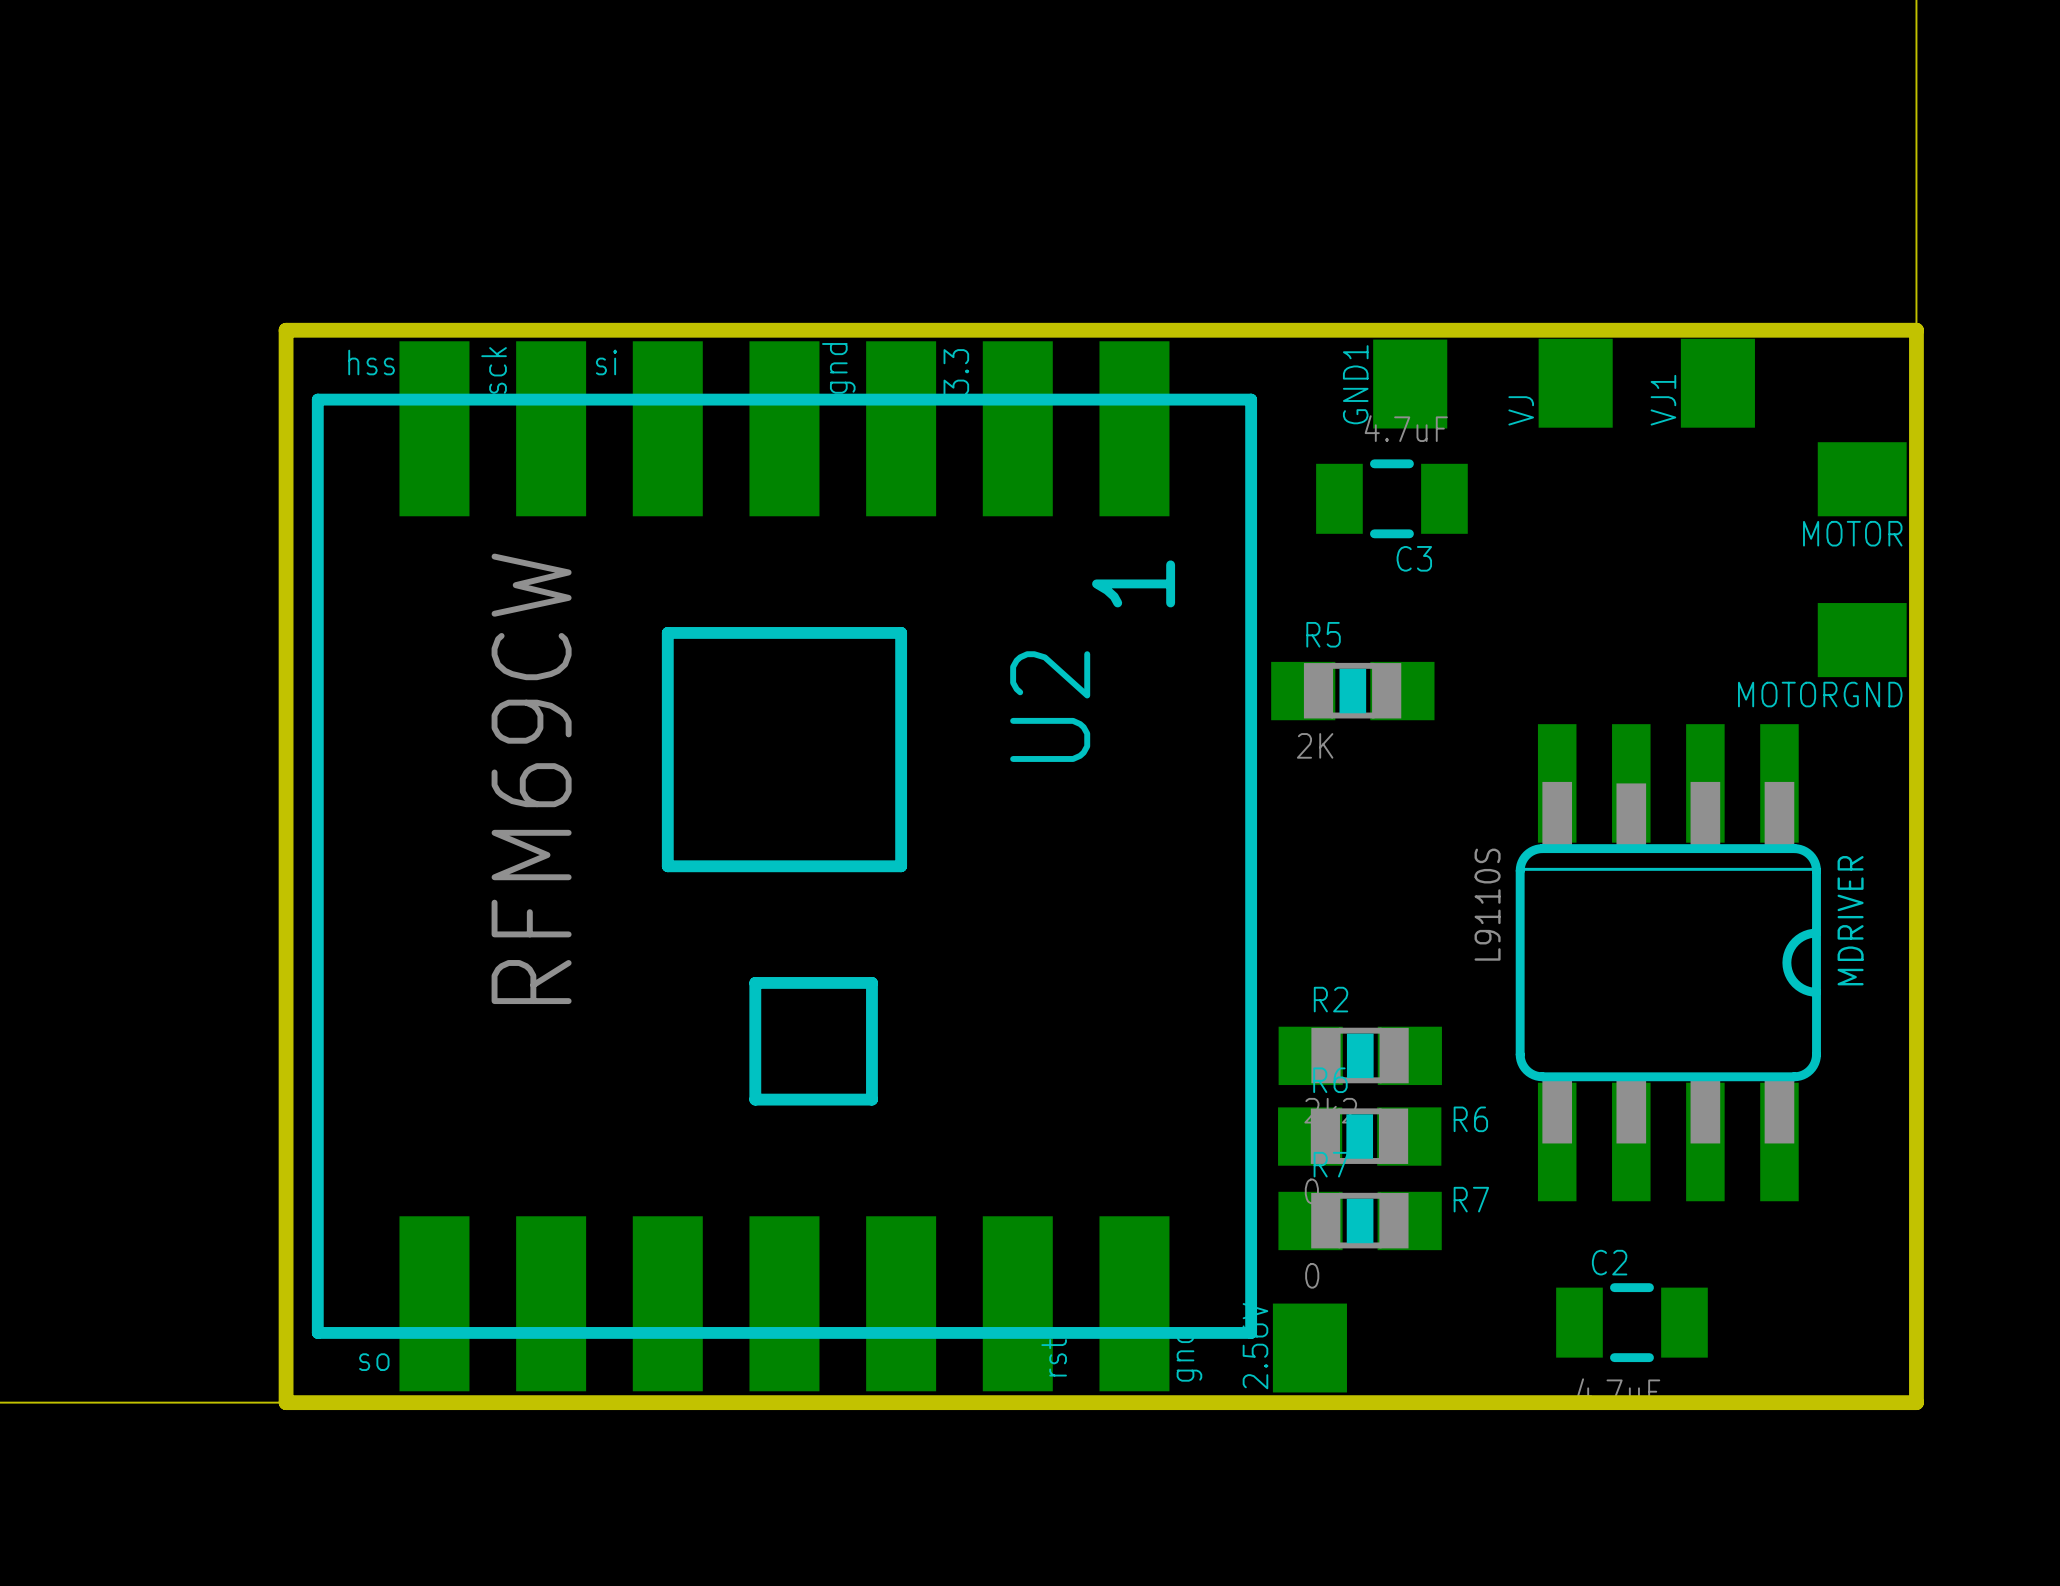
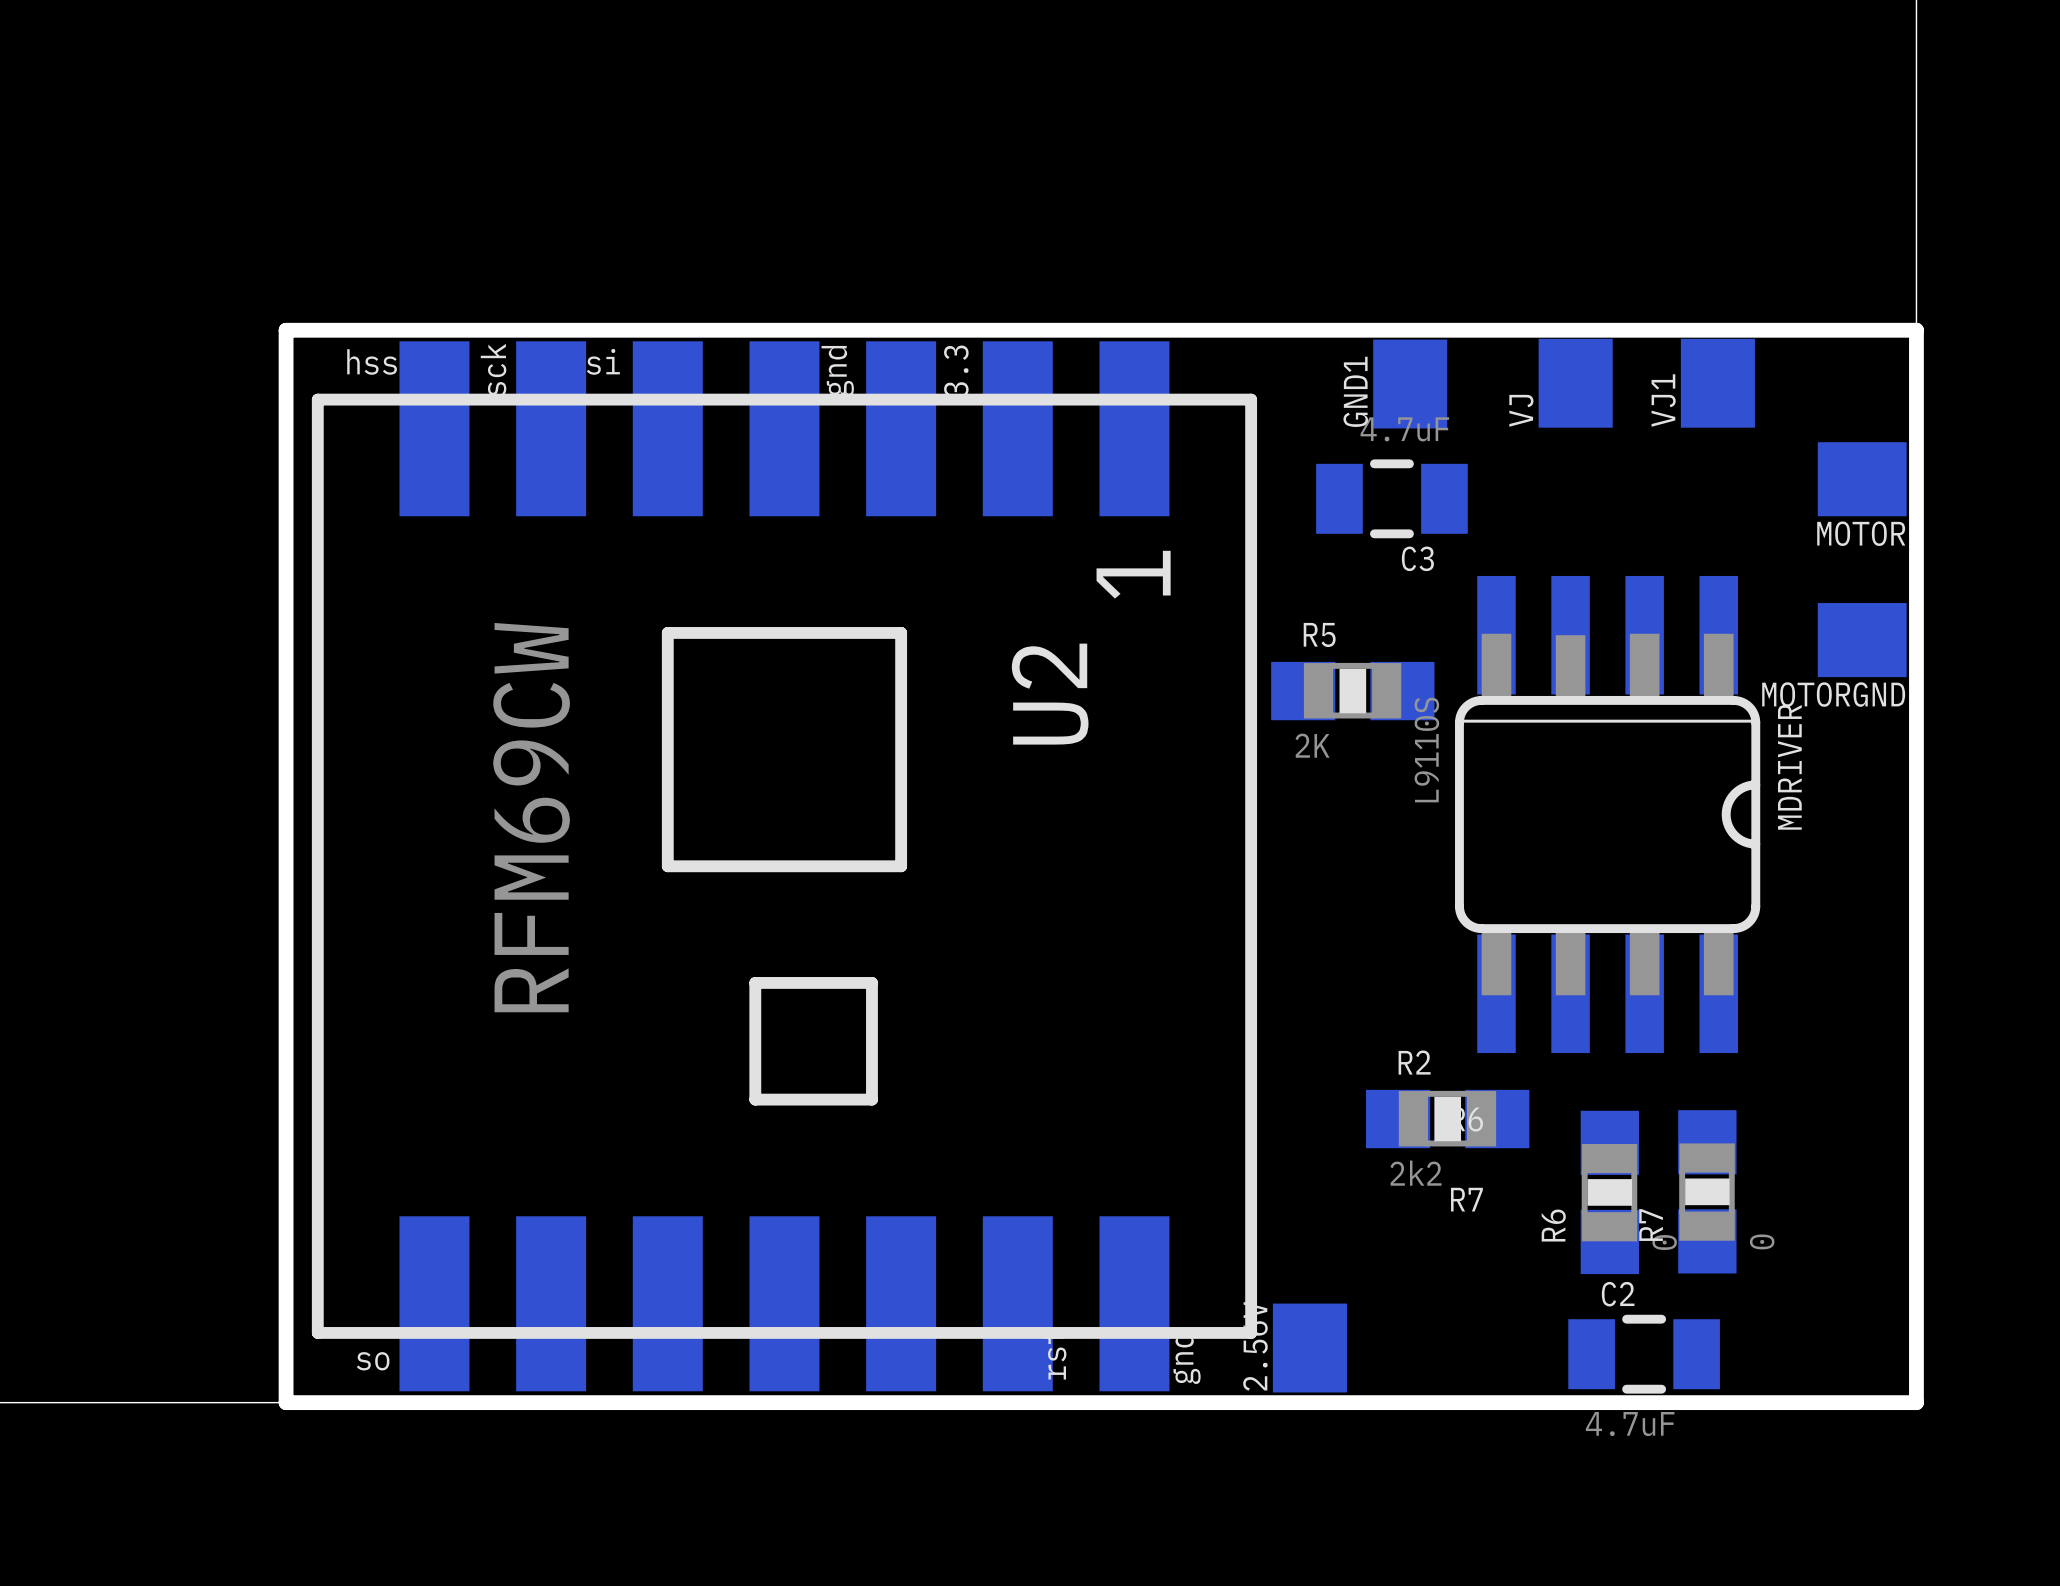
MDRIVER position: (1668, 962) -> (1607, 814)
R2 position: (1360, 1055) -> (1447, 1119)
R6 rotation: 0° (1359, 1136) -> 90° clockwise (1609, 1192)
R6 position: (1359, 1136) -> (1609, 1192)
R7 rotation: 0° (1360, 1220) -> 90° clockwise (1707, 1191)
R7 position: (1360, 1220) -> (1707, 1191)
C2 position: (1631, 1322) -> (1644, 1354)

